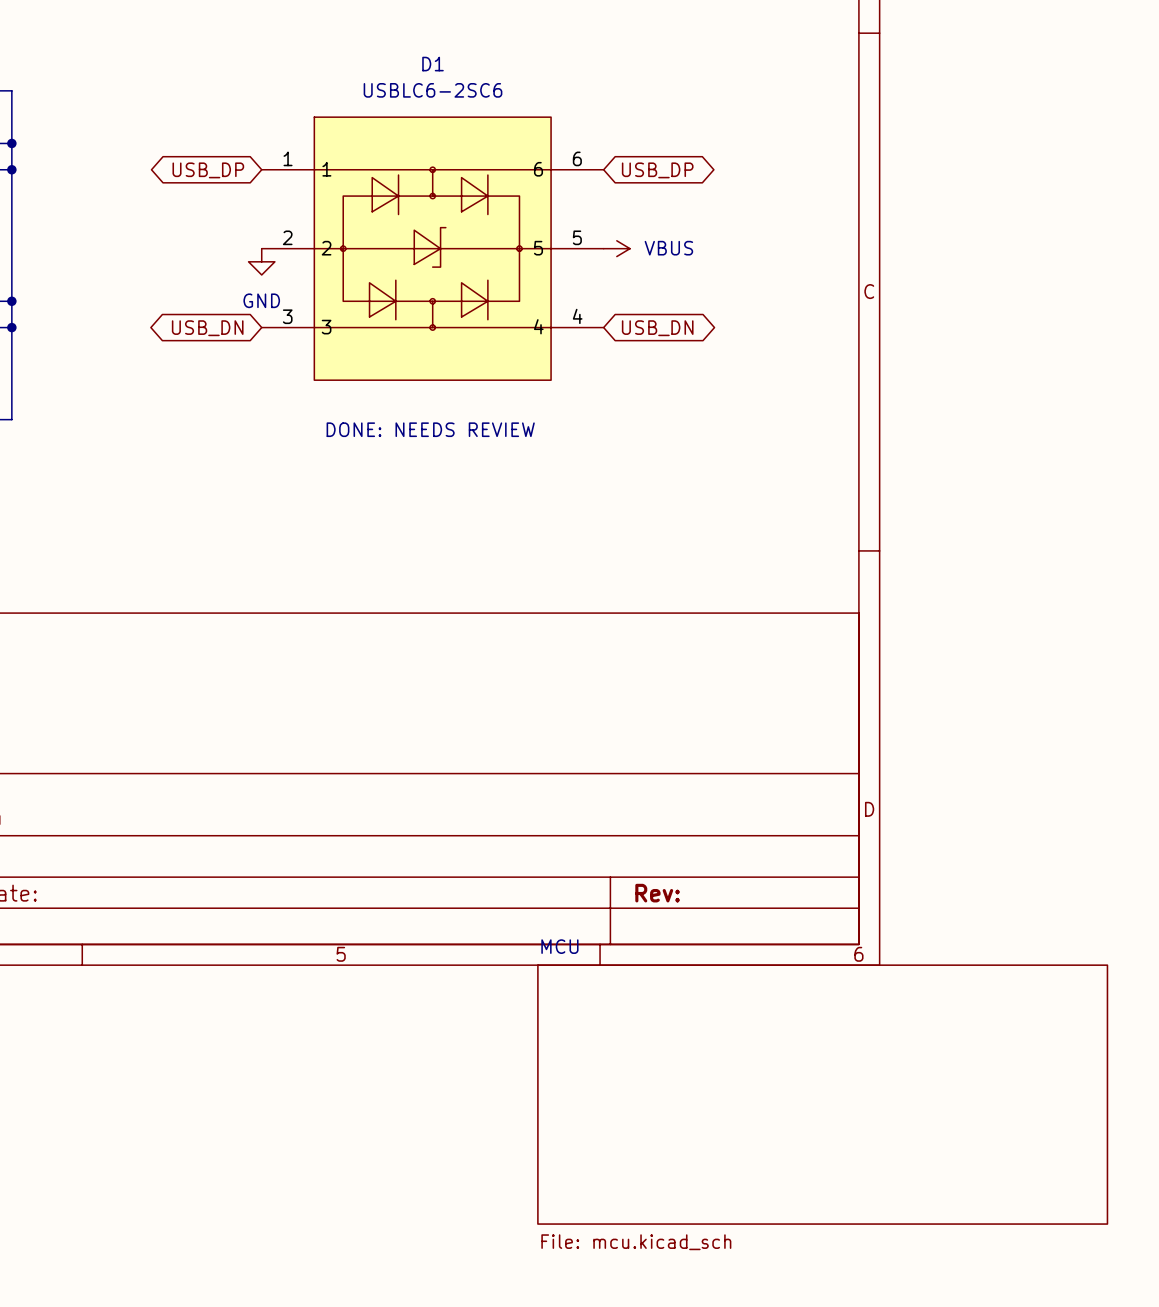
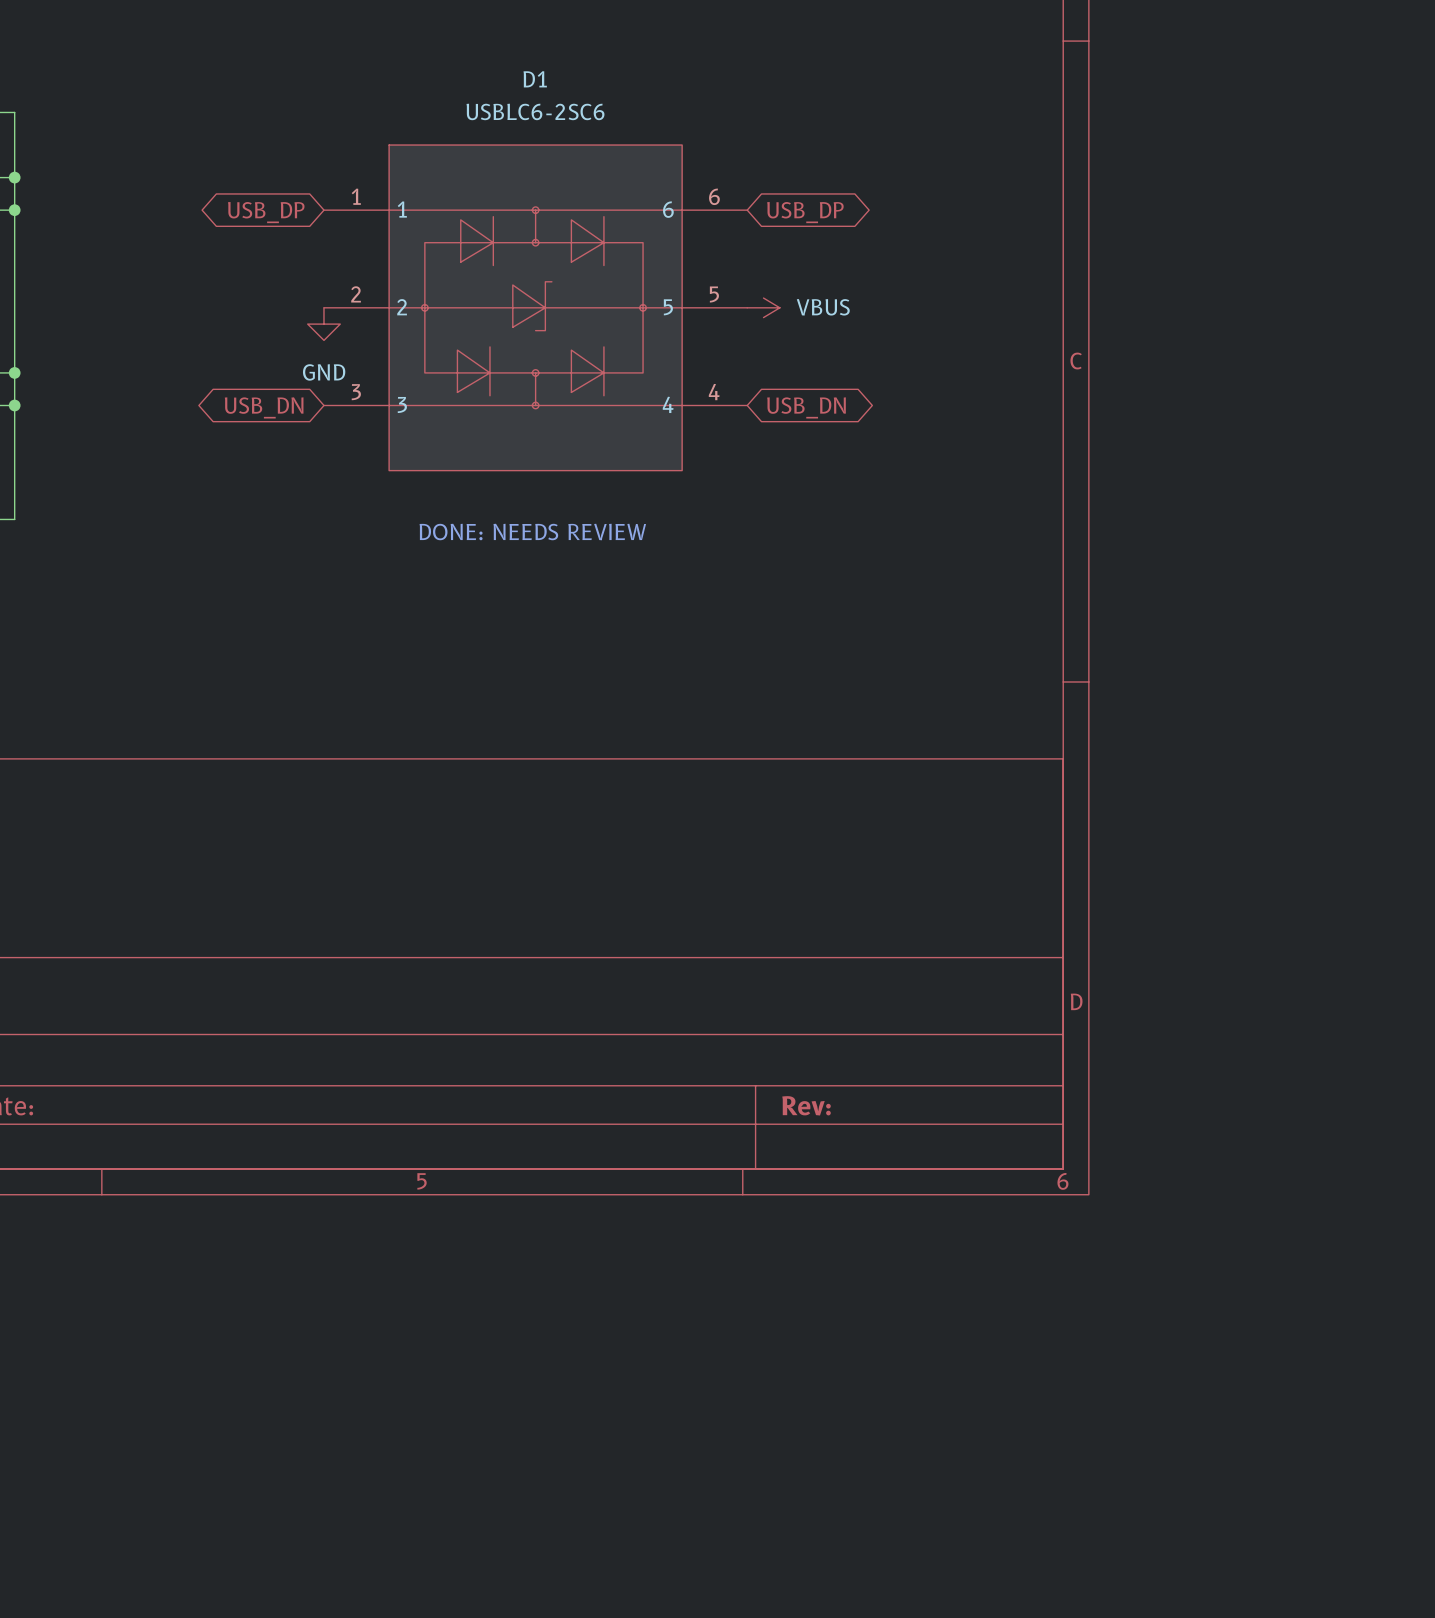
sheet MCU: File: mcu.kicad_sch (822, 1094) -> none

